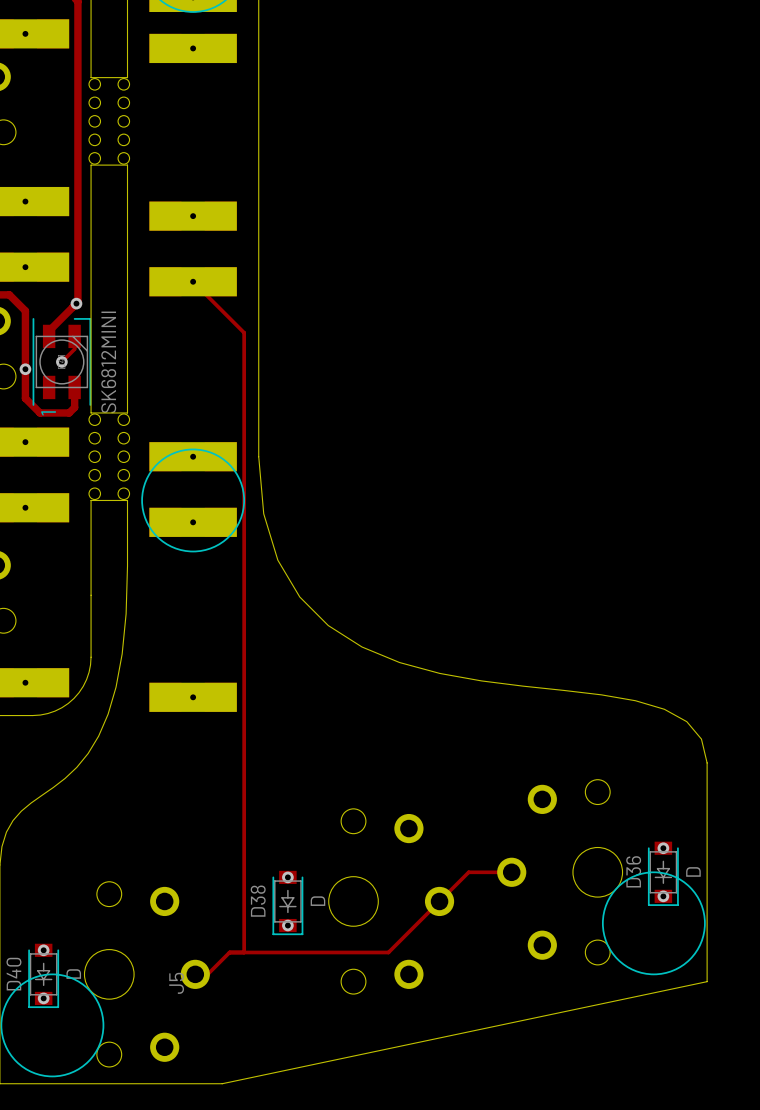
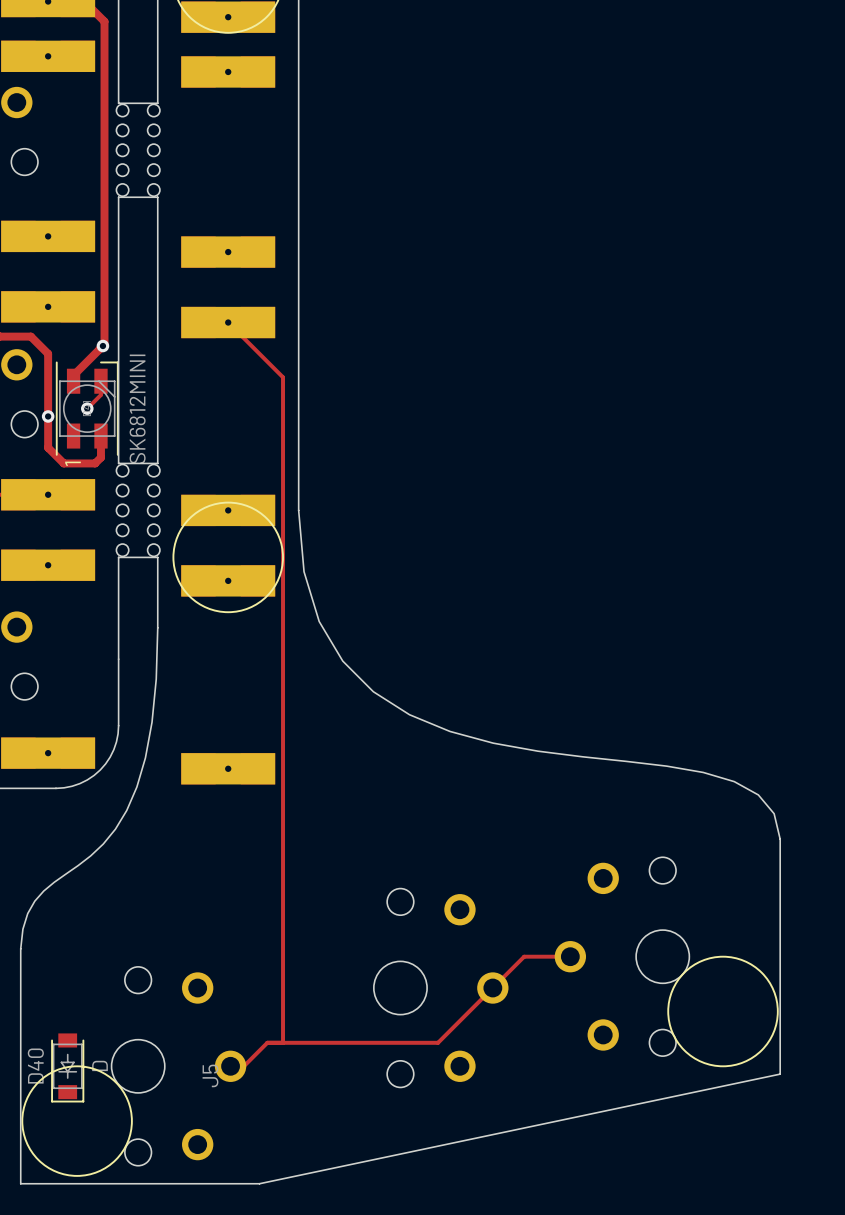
via: (663, 848) -> none
D36: D (663, 873) -> none
via: (287, 877) -> none
via: (663, 896) -> none
D38: D (287, 902) -> none
via: (287, 925) -> none
via: (43, 950) -> none
via: (43, 998) -> none

